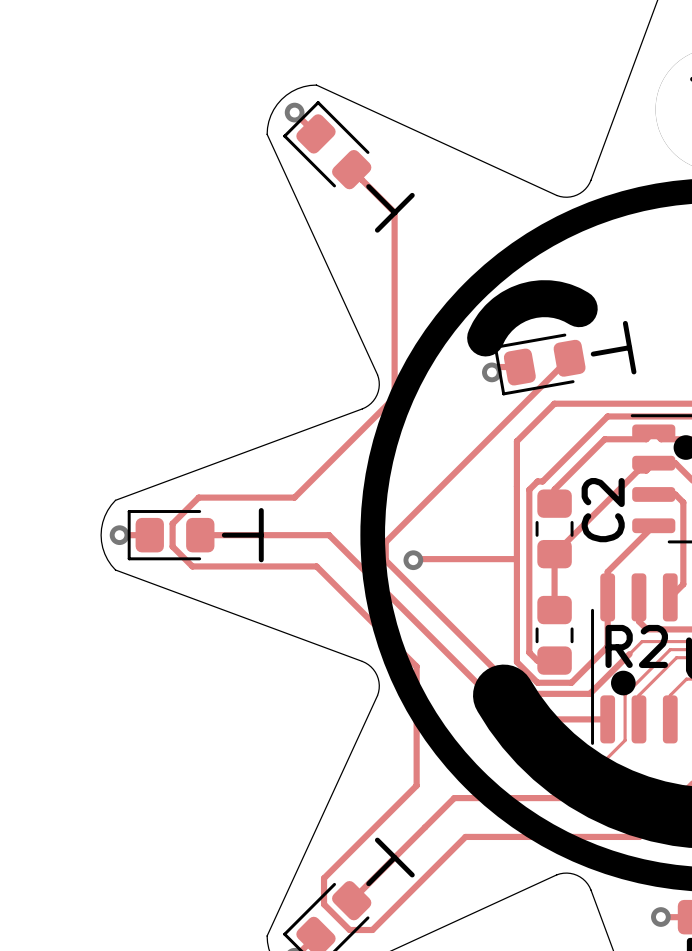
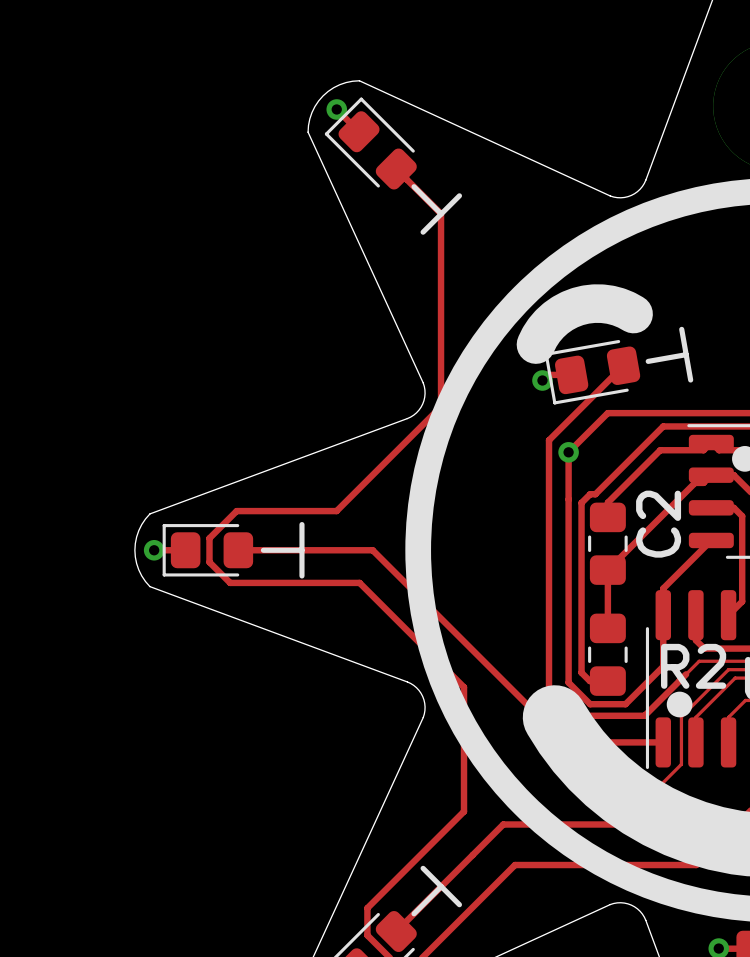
track: (498, 429) (385, 542) (385, 560) (498, 672) -> (549, 440) (549, 693)
via: none -> (568, 452)
track: (516, 559) (413, 560) -> none
via: (413, 560) -> none

